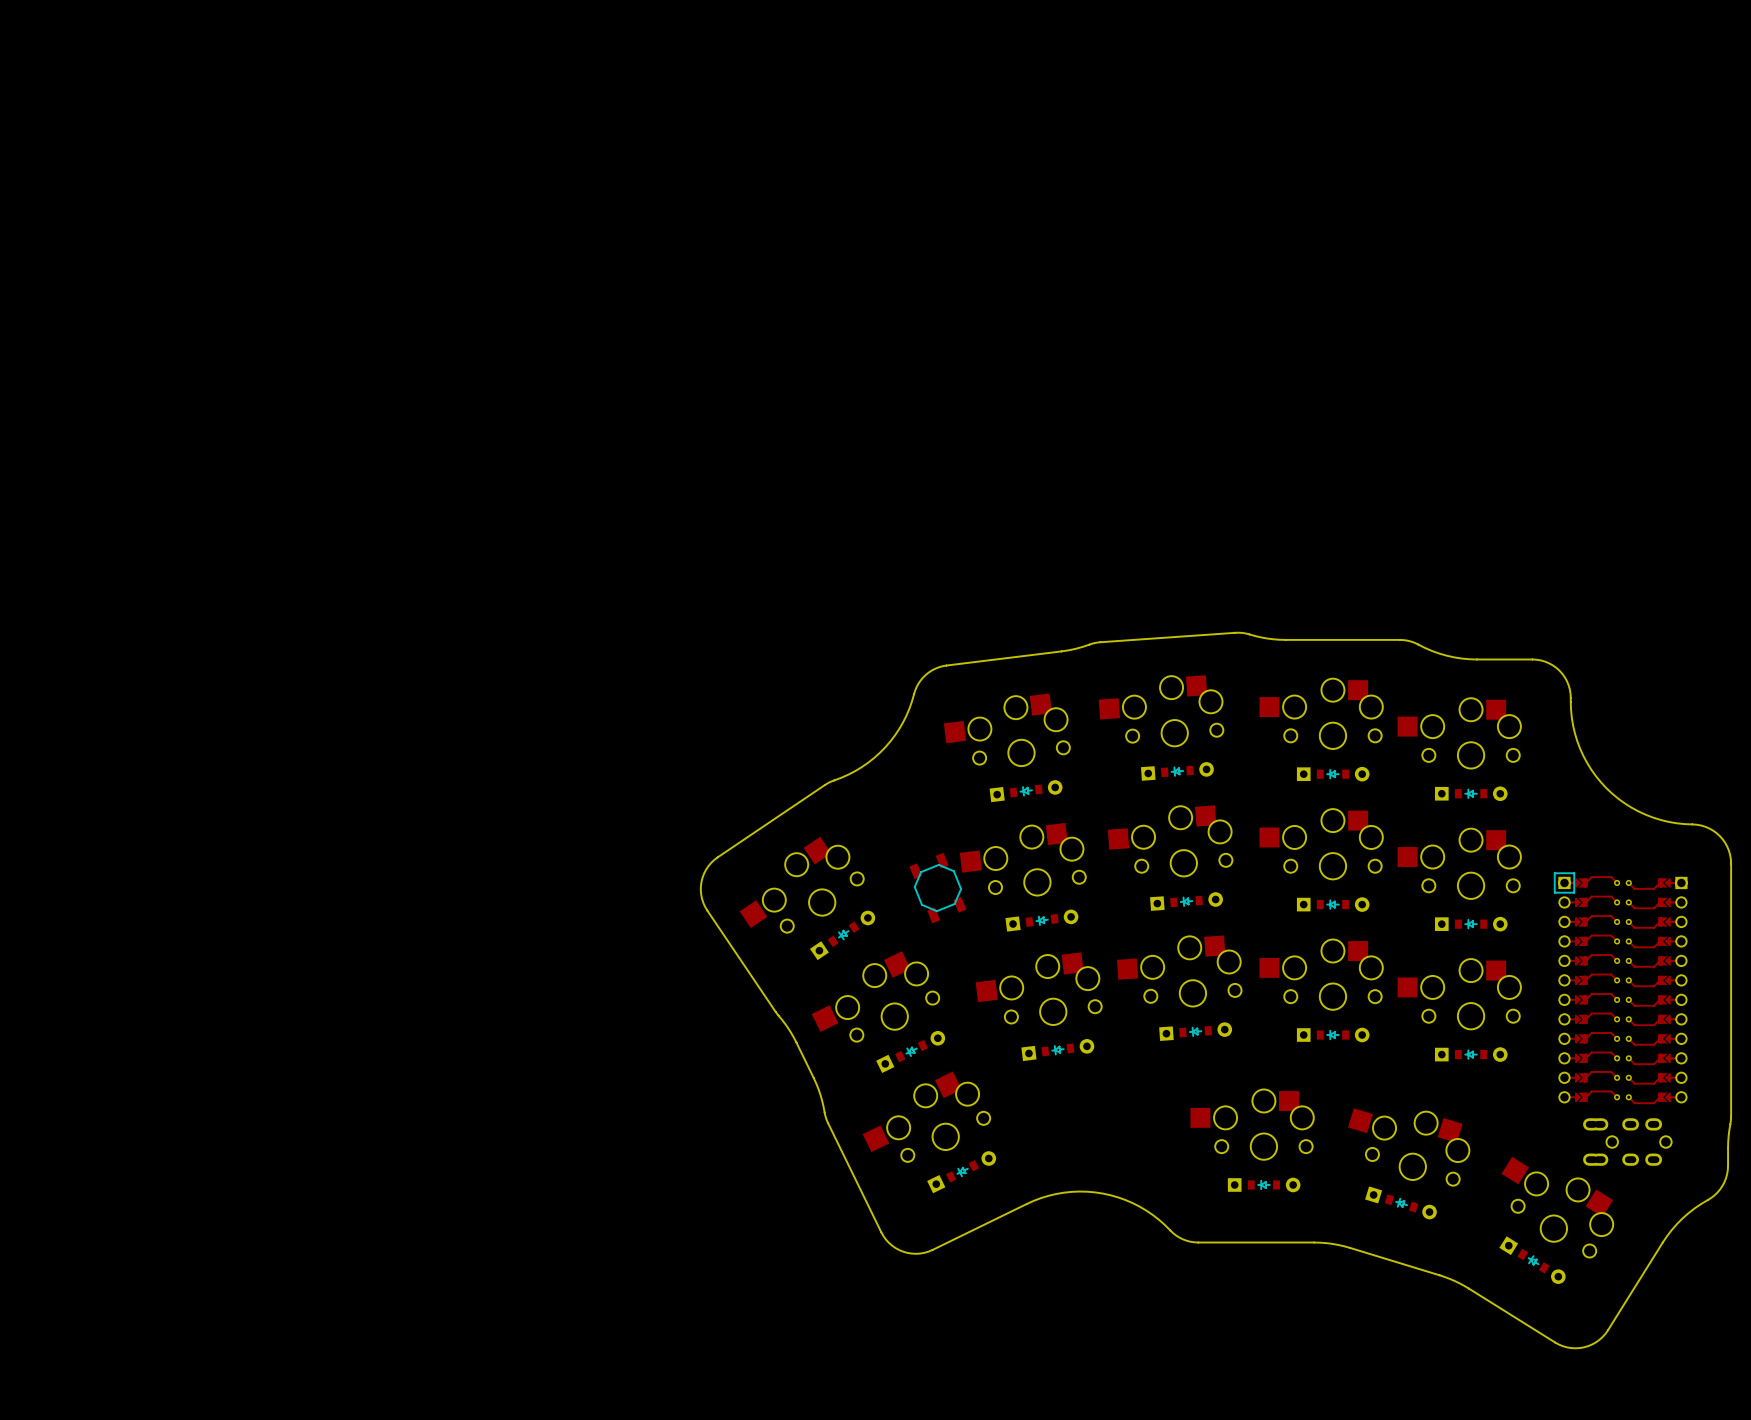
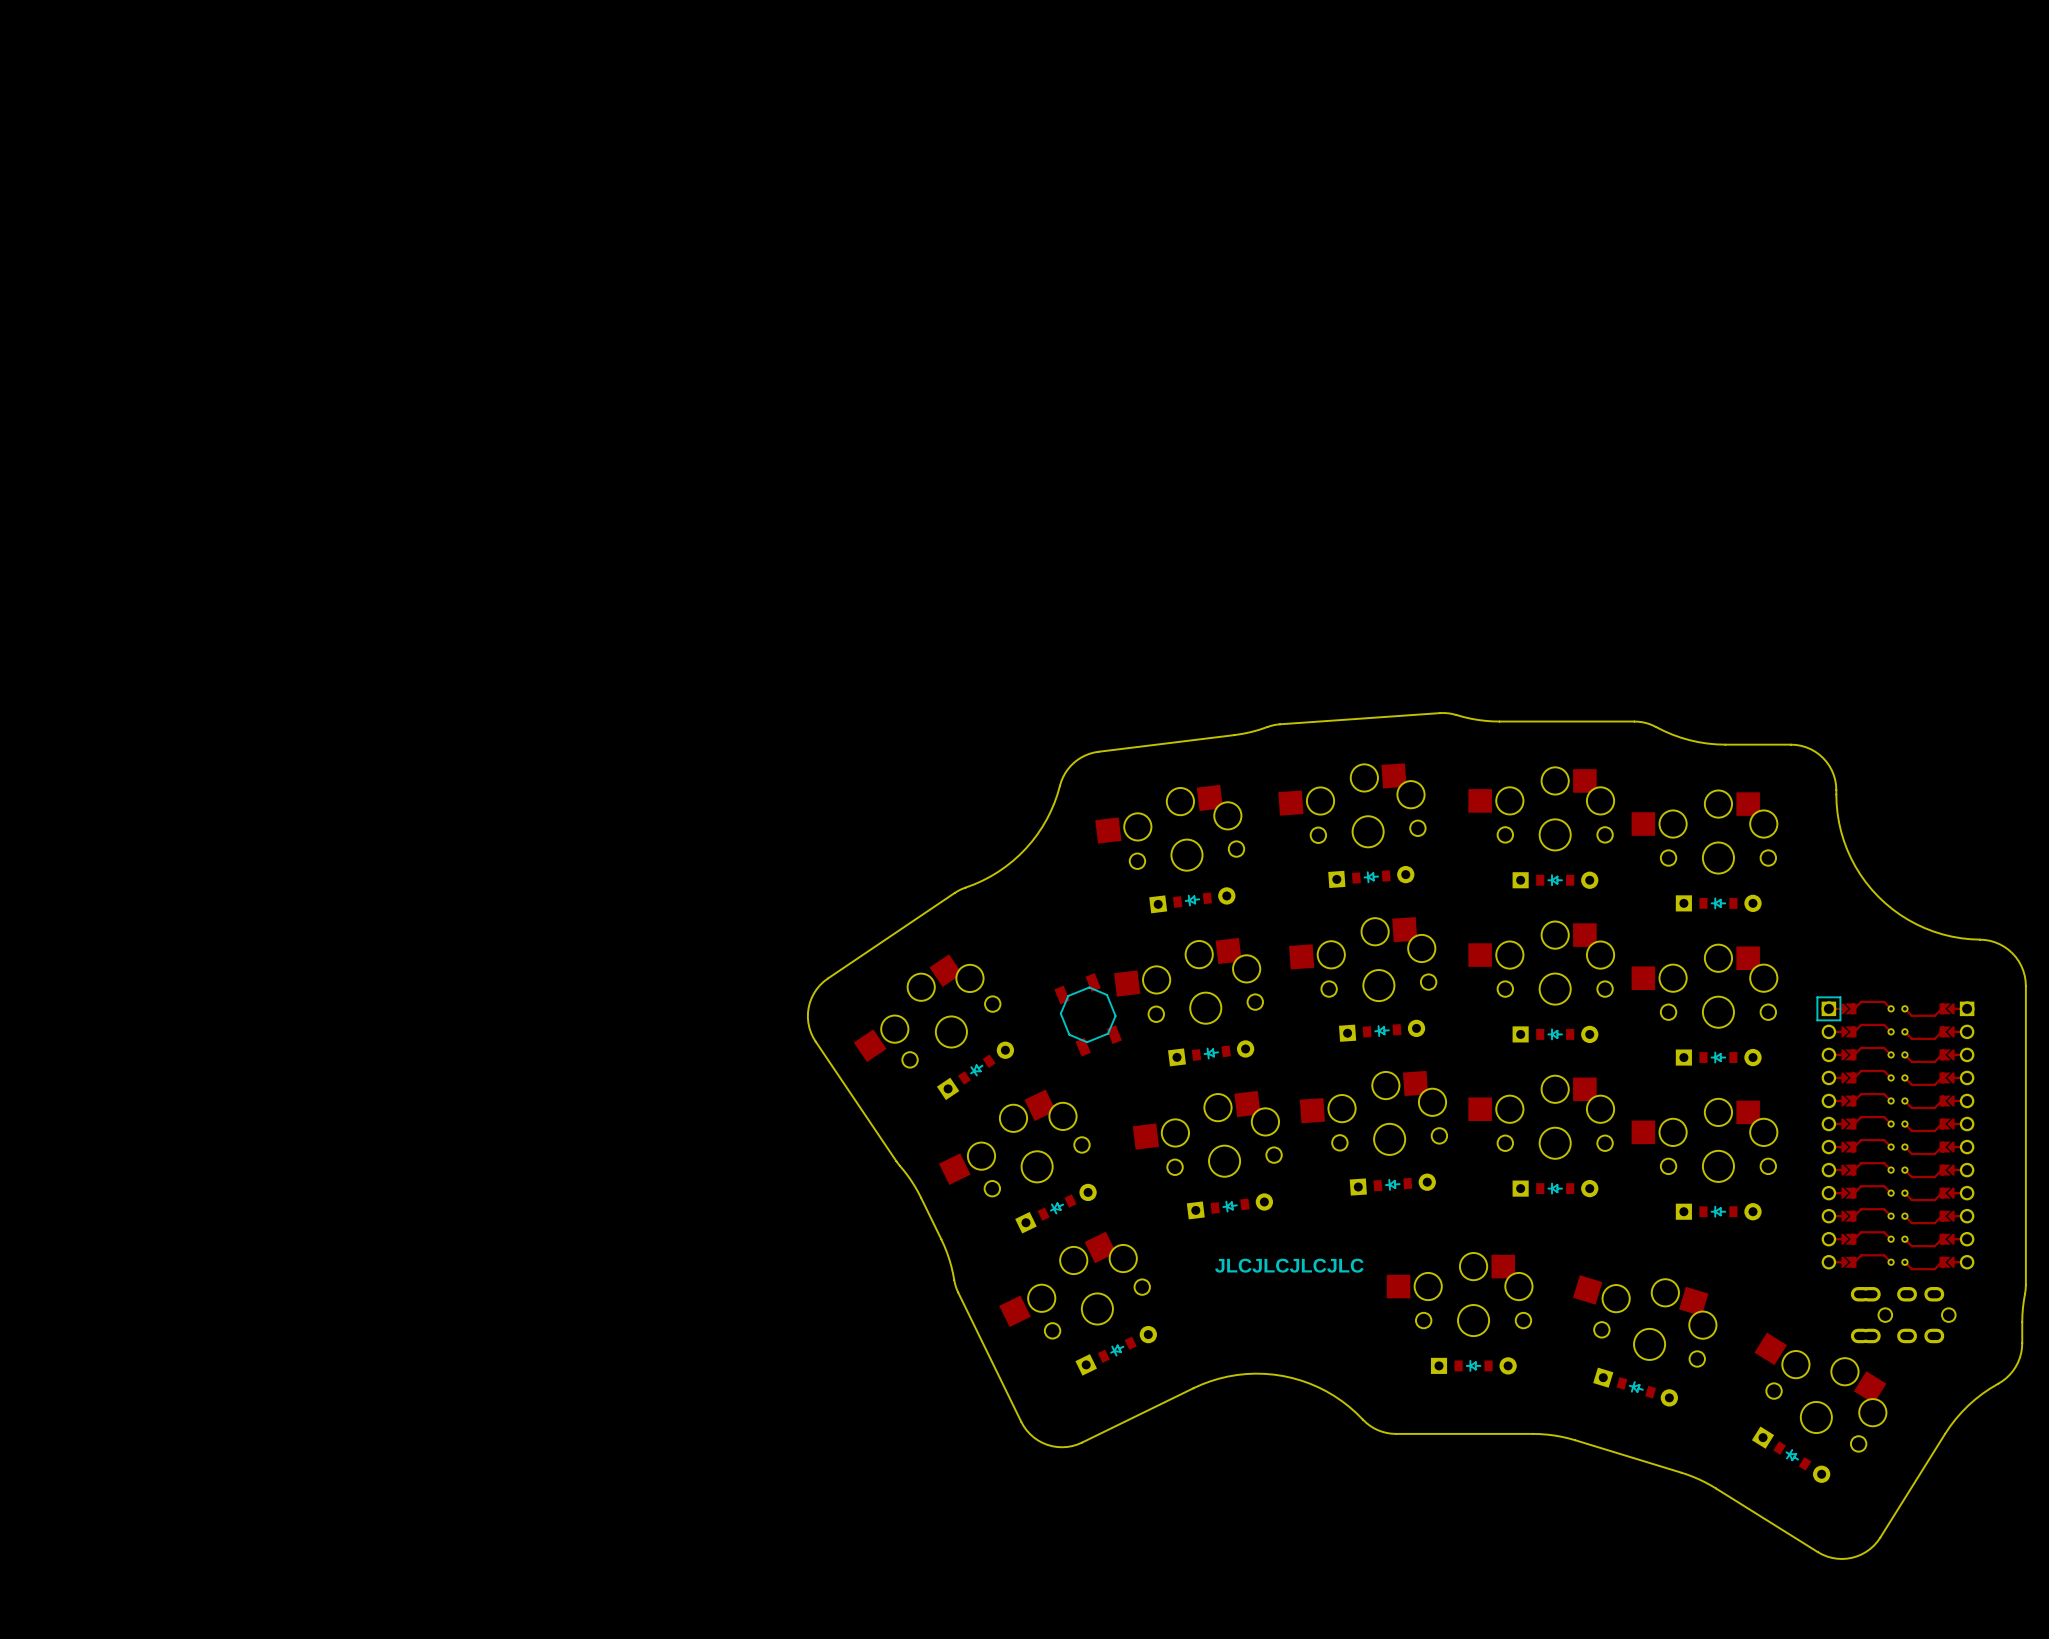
text: none -> JLCJLCJLCJLC (1289, 1265)

